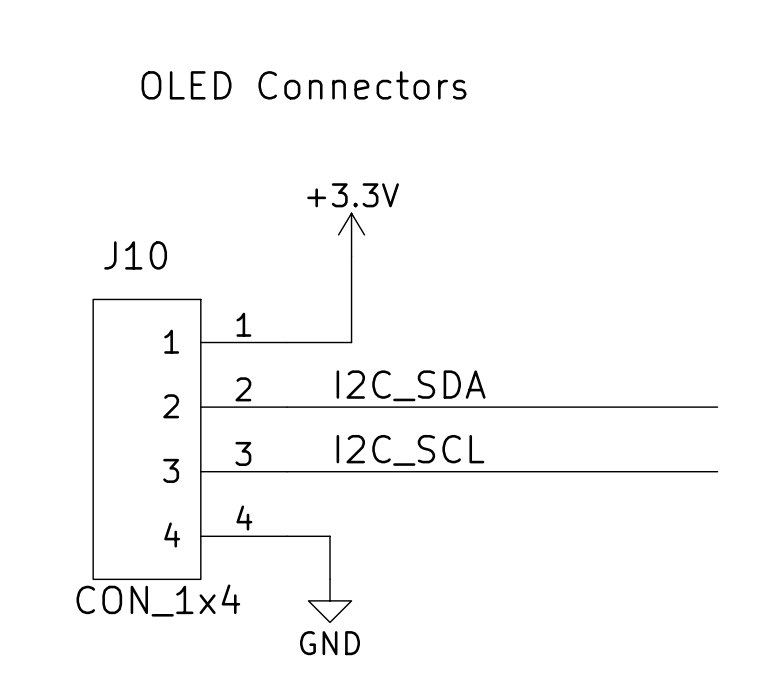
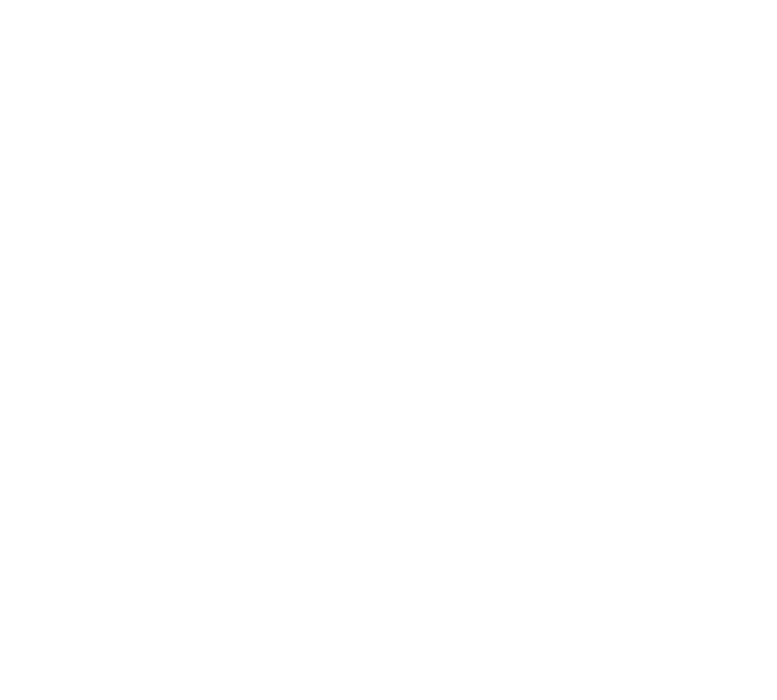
text: OLED Connectors (304, 85) -> none
power symbol: +3.3V (351, 234) -> none
wire: (351, 256) (351, 342) (286, 342) -> none
label: I2C_SDA (411, 385) -> none
wire: (286, 407) (717, 407) -> none
J10: CON_1x4 (190, 439) -> none
label: I2C_SCL (410, 450) -> none
wire: (286, 471) (717, 471) -> none
wire: (286, 536) (330, 536) (330, 579) -> none
power symbol: GND (330, 600) -> none

